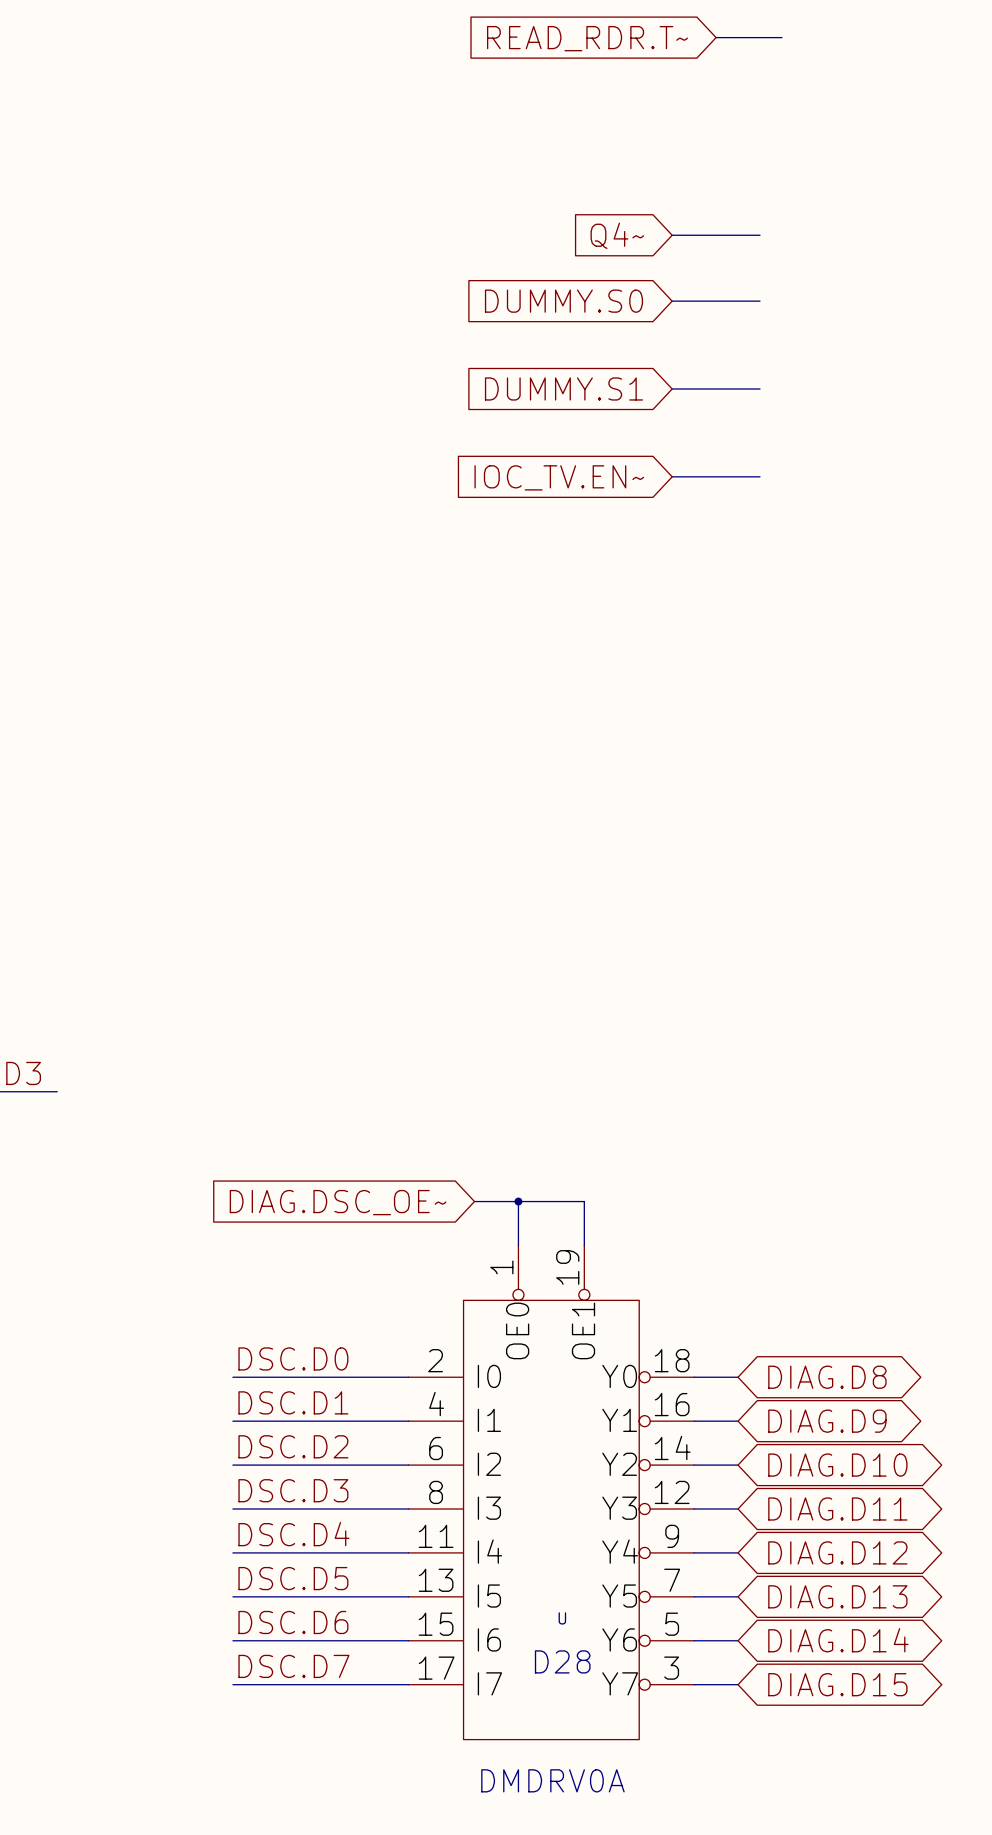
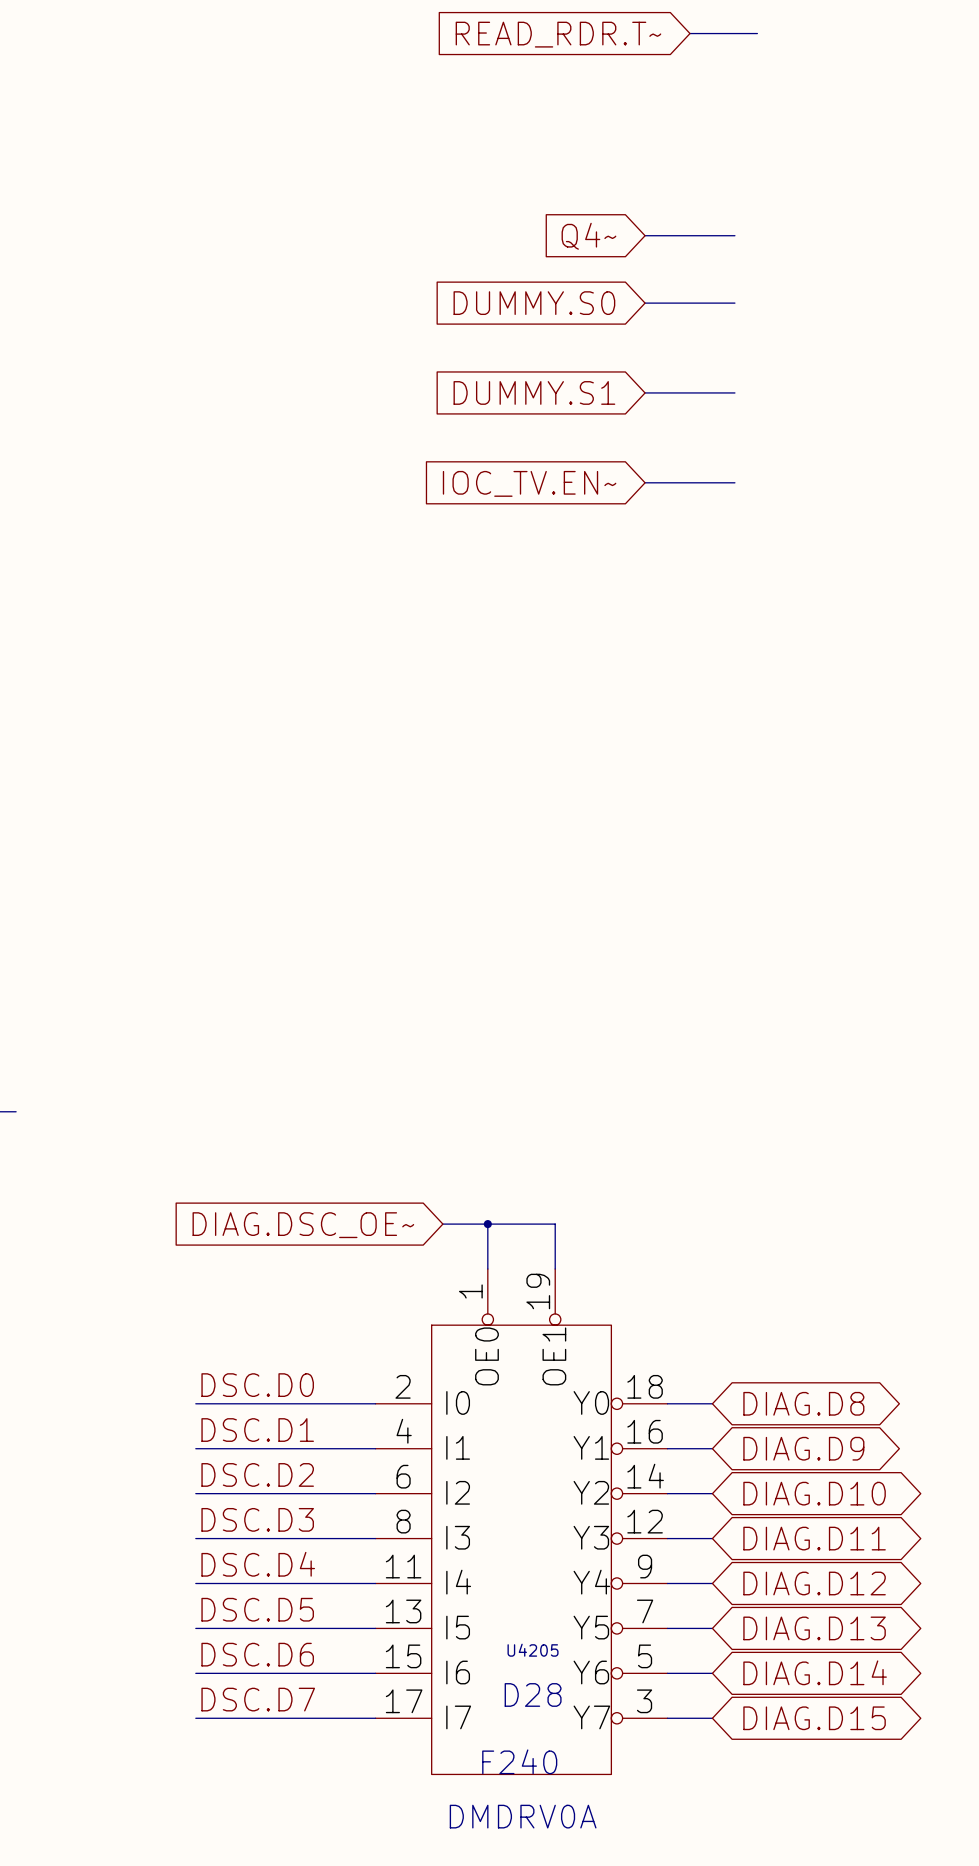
U name: U (562, 1618) -> U4205 (533, 1650)
U value: none -> F240 (519, 1761)

